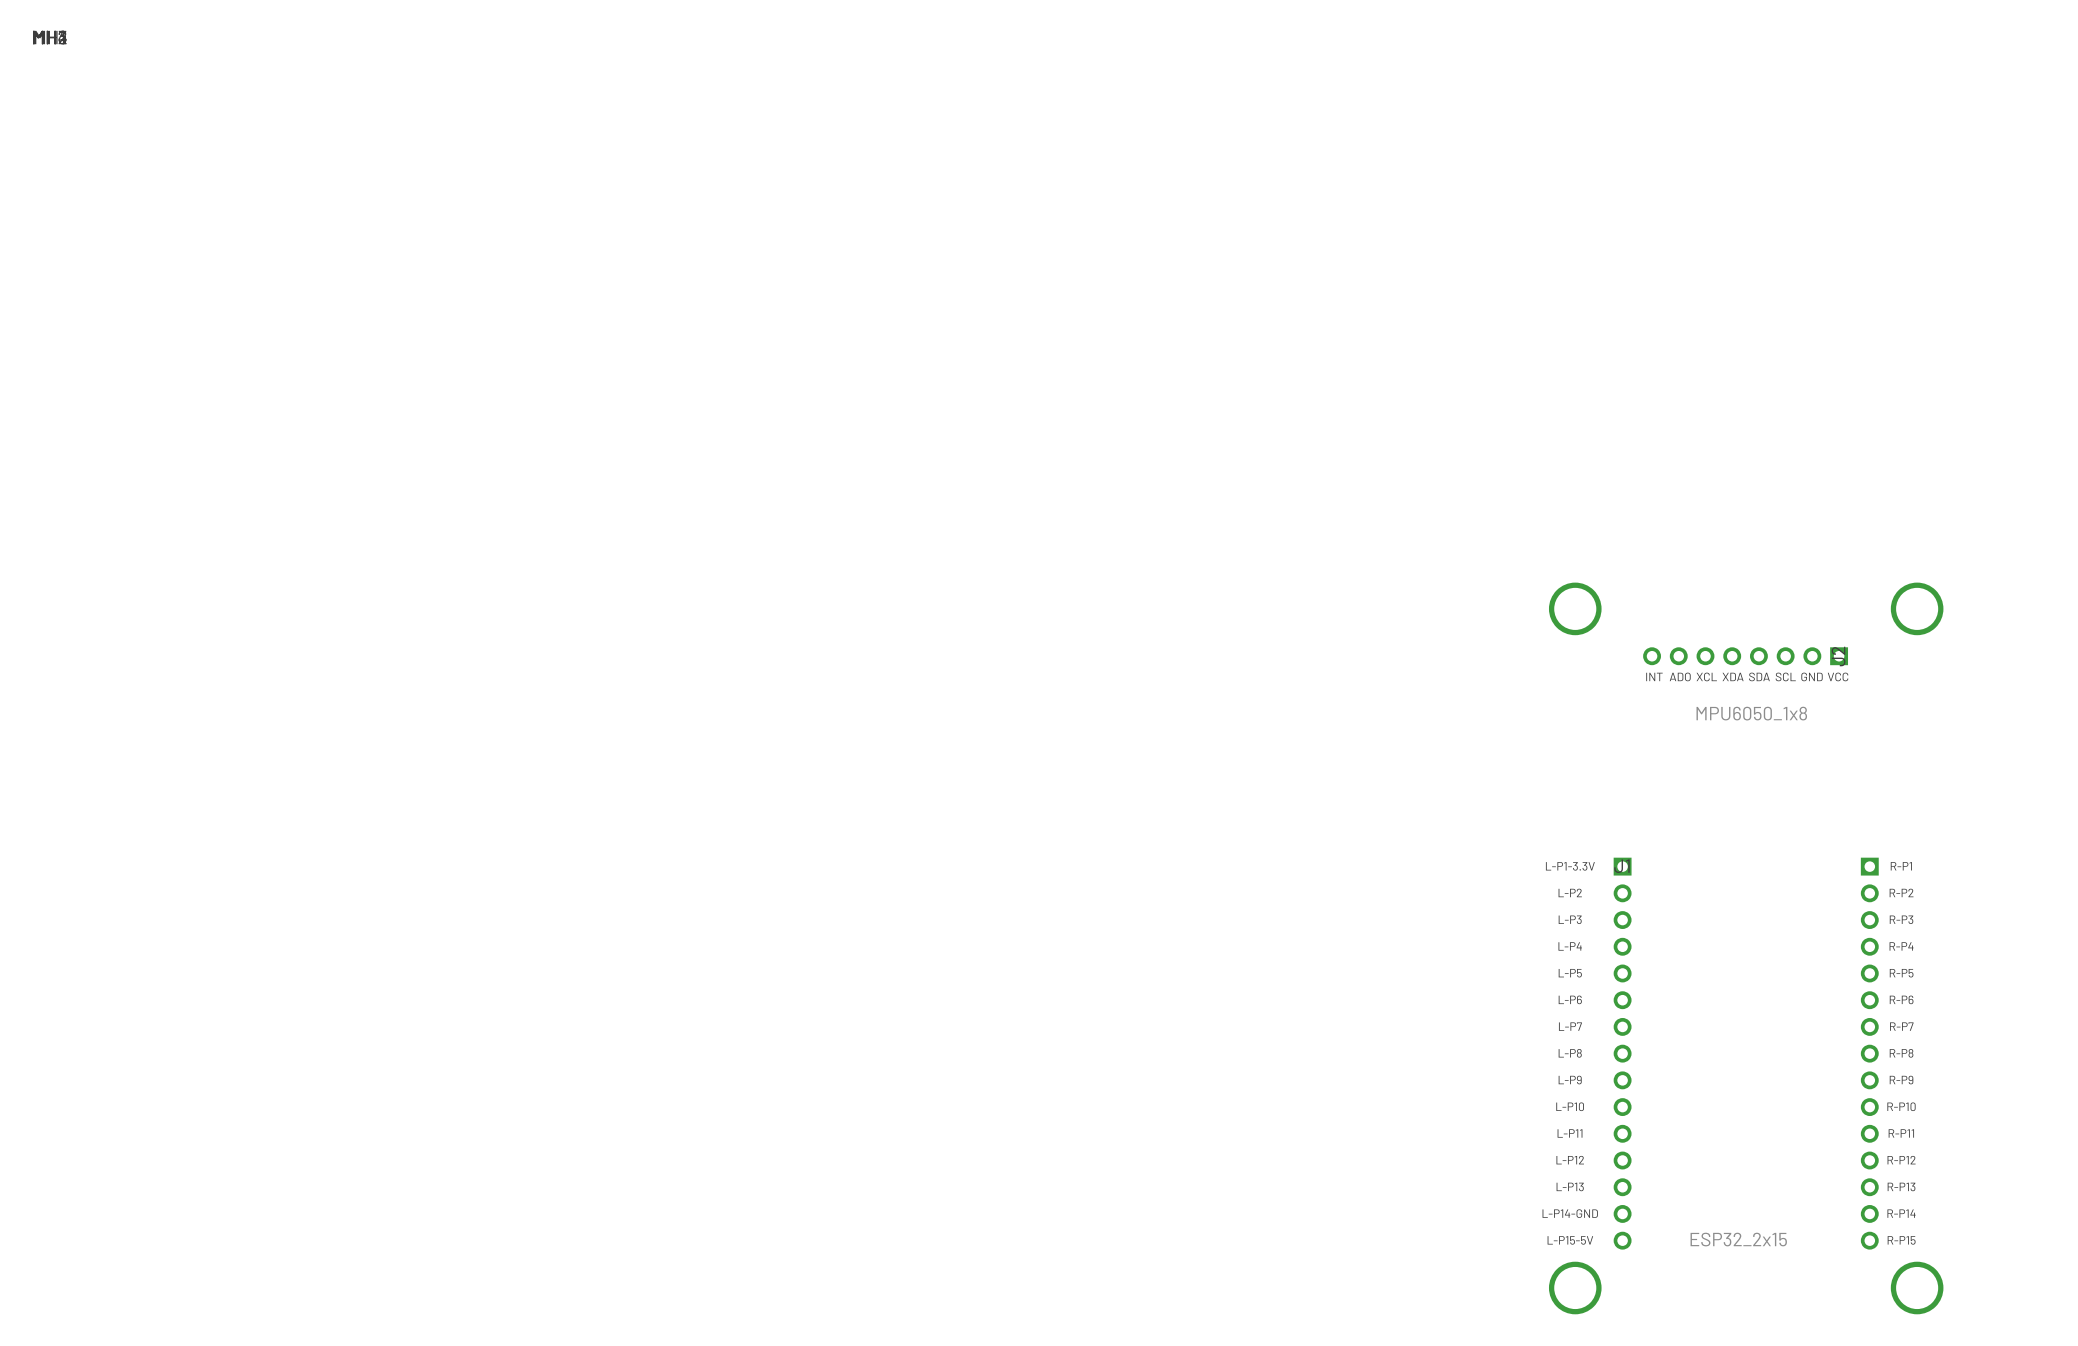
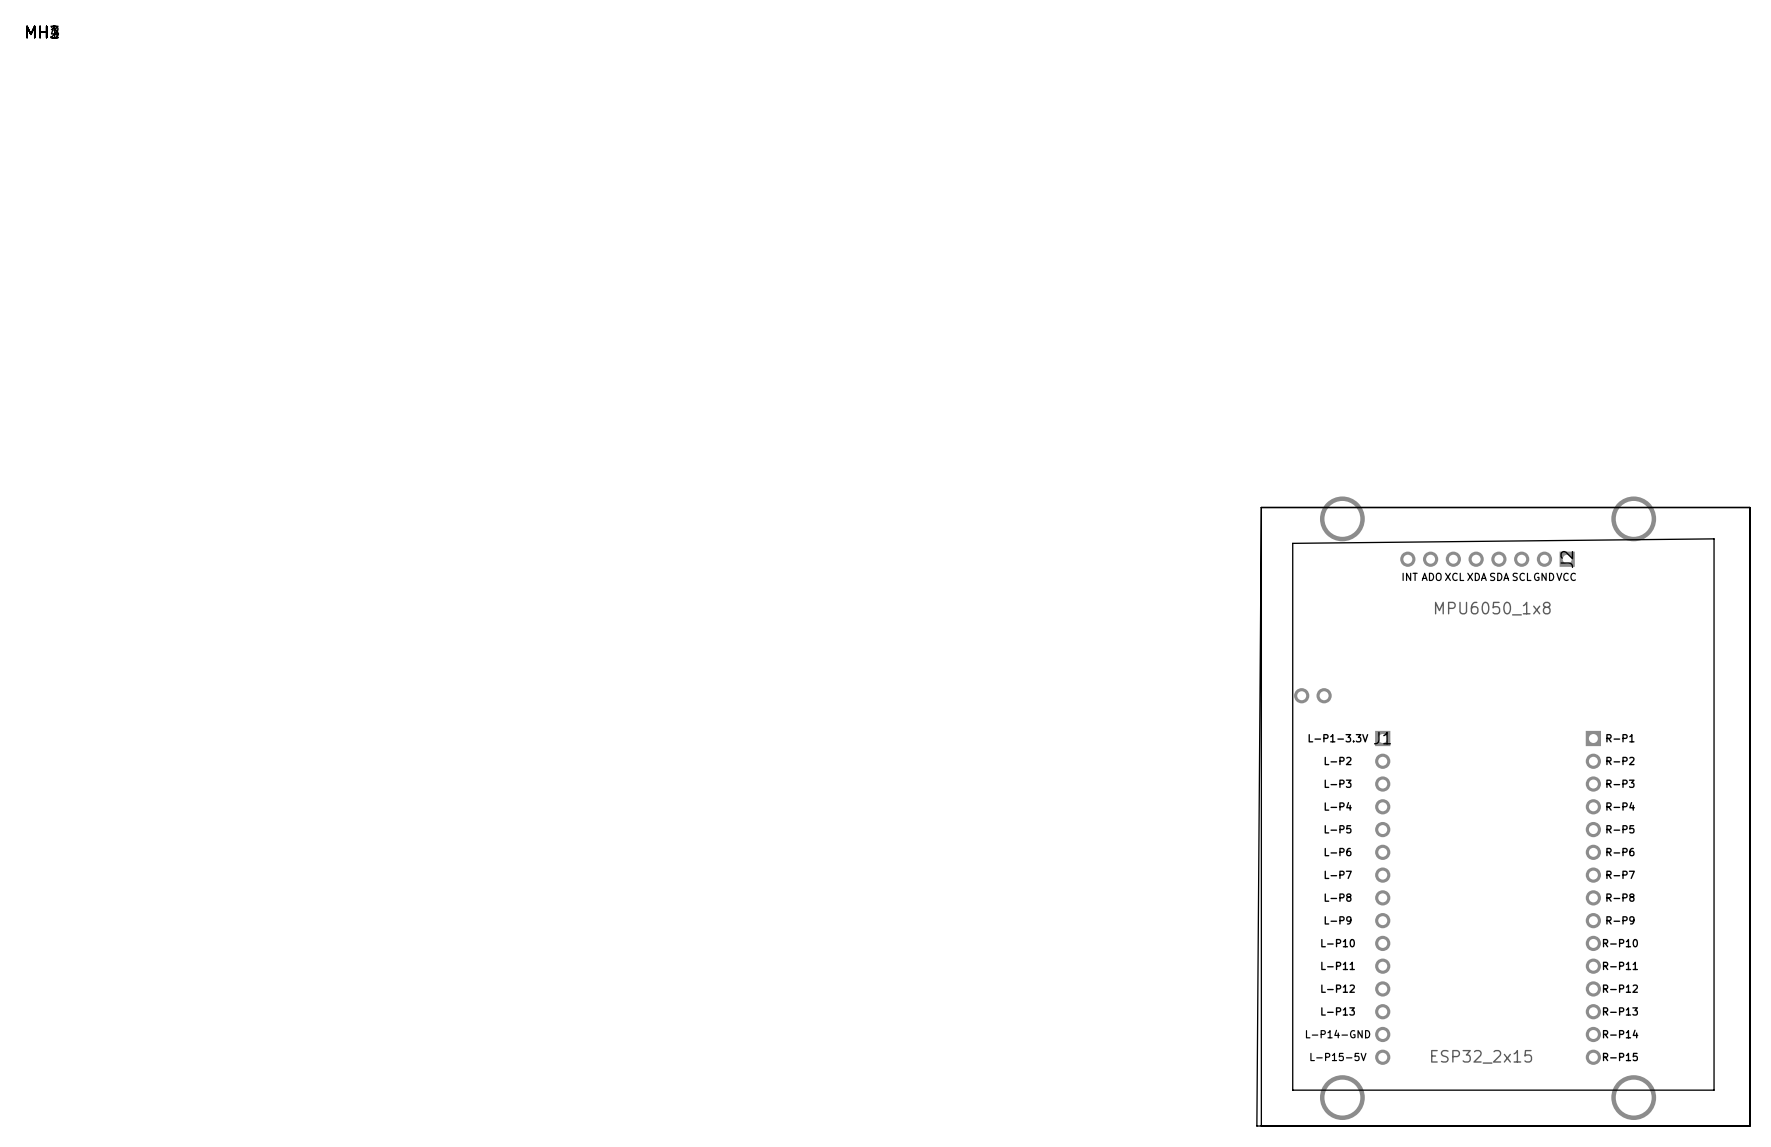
line: none -> (1261, 507) (1256, 1126) (1749, 1126) (1749, 507) (1261, 507)
line: none -> (1261, 507) (1261, 1126)
board edge: none -> (1714, 538) (1292, 543) (1292, 1090) (1714, 1090) (1714, 538)
part: none -> (1301, 695)
part: none -> (1324, 695)

